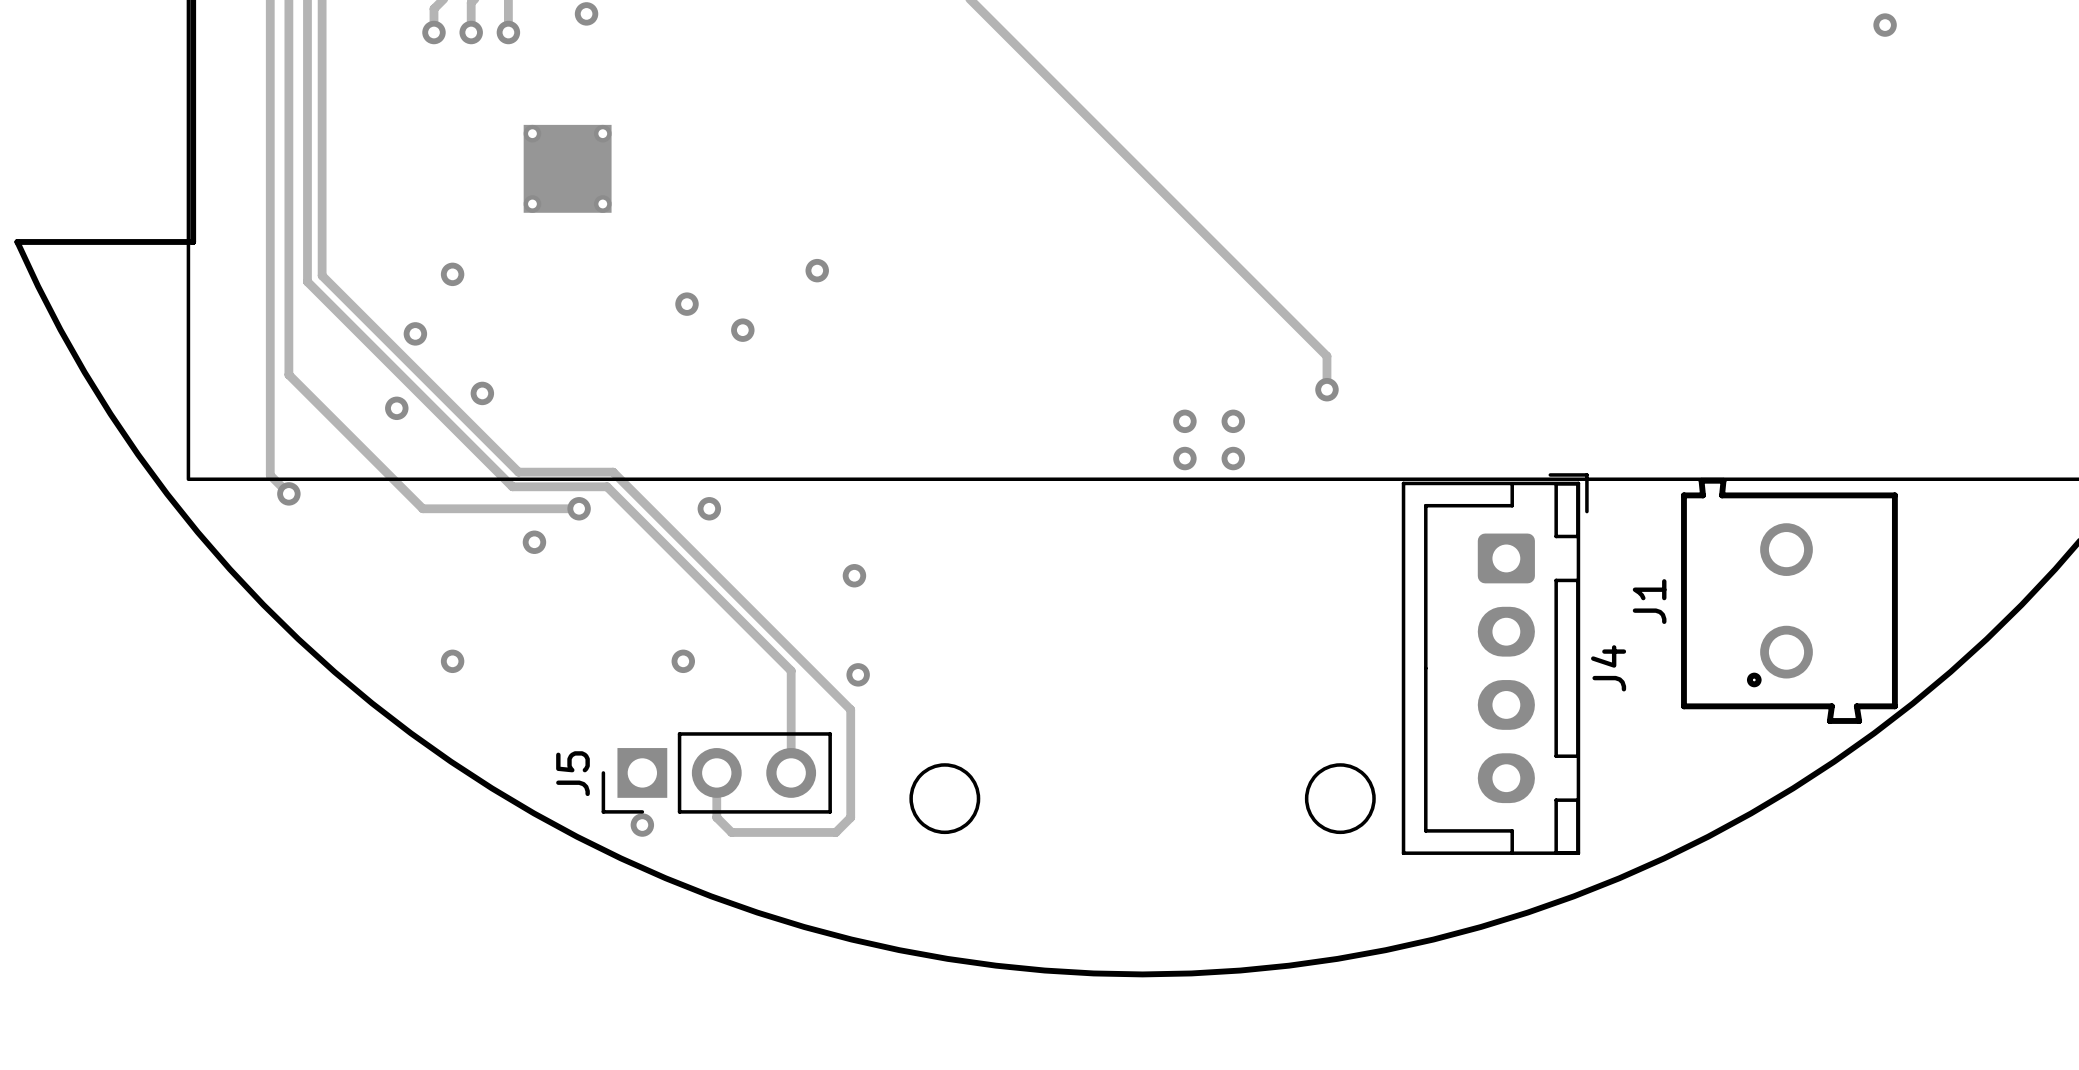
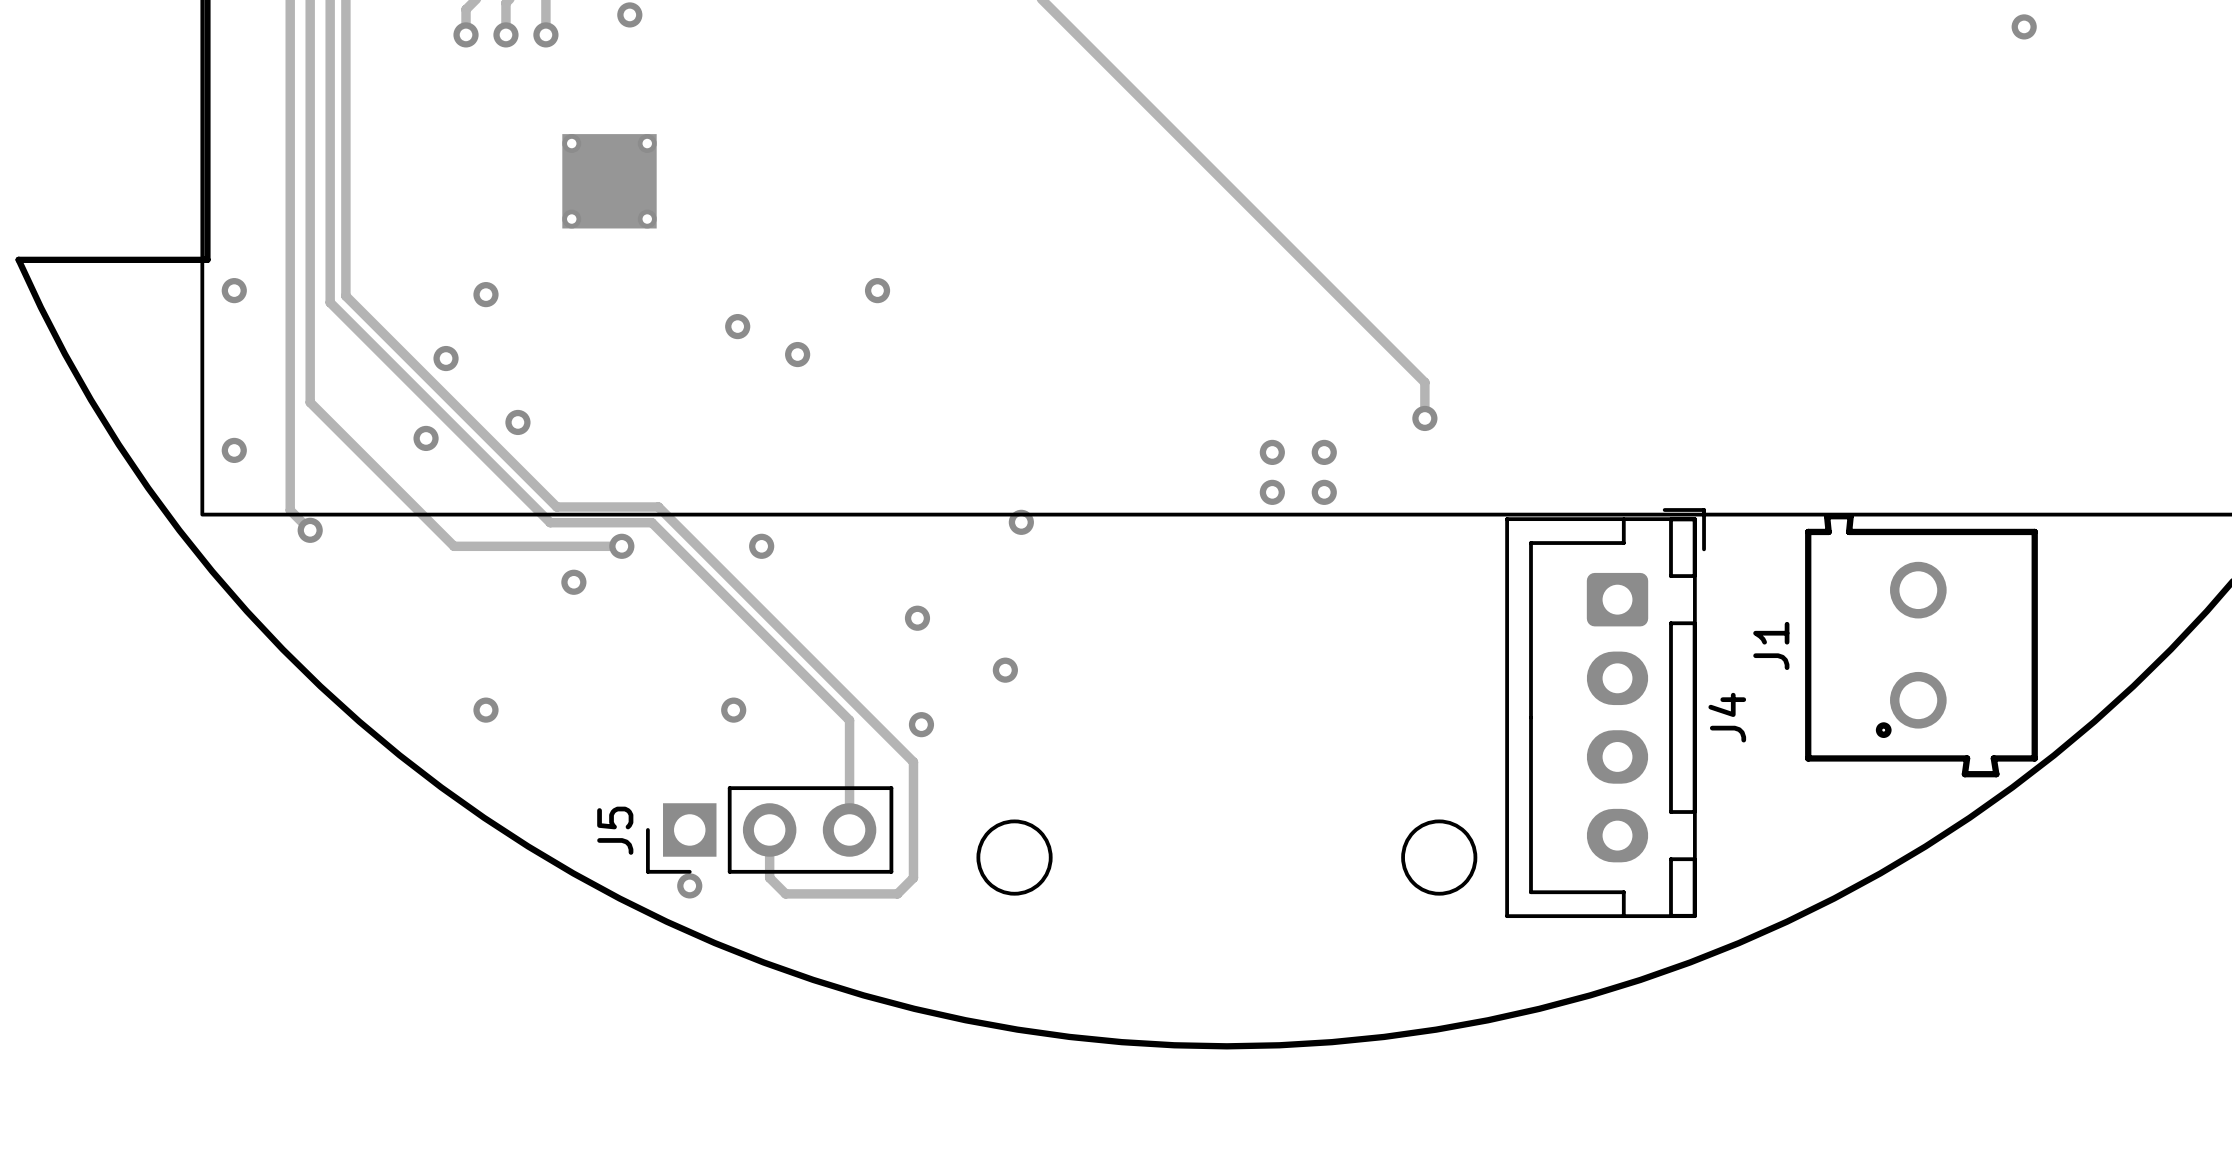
via: none -> (234, 290)
via: none -> (234, 450)
via: none -> (1021, 522)
via: none -> (1005, 670)

